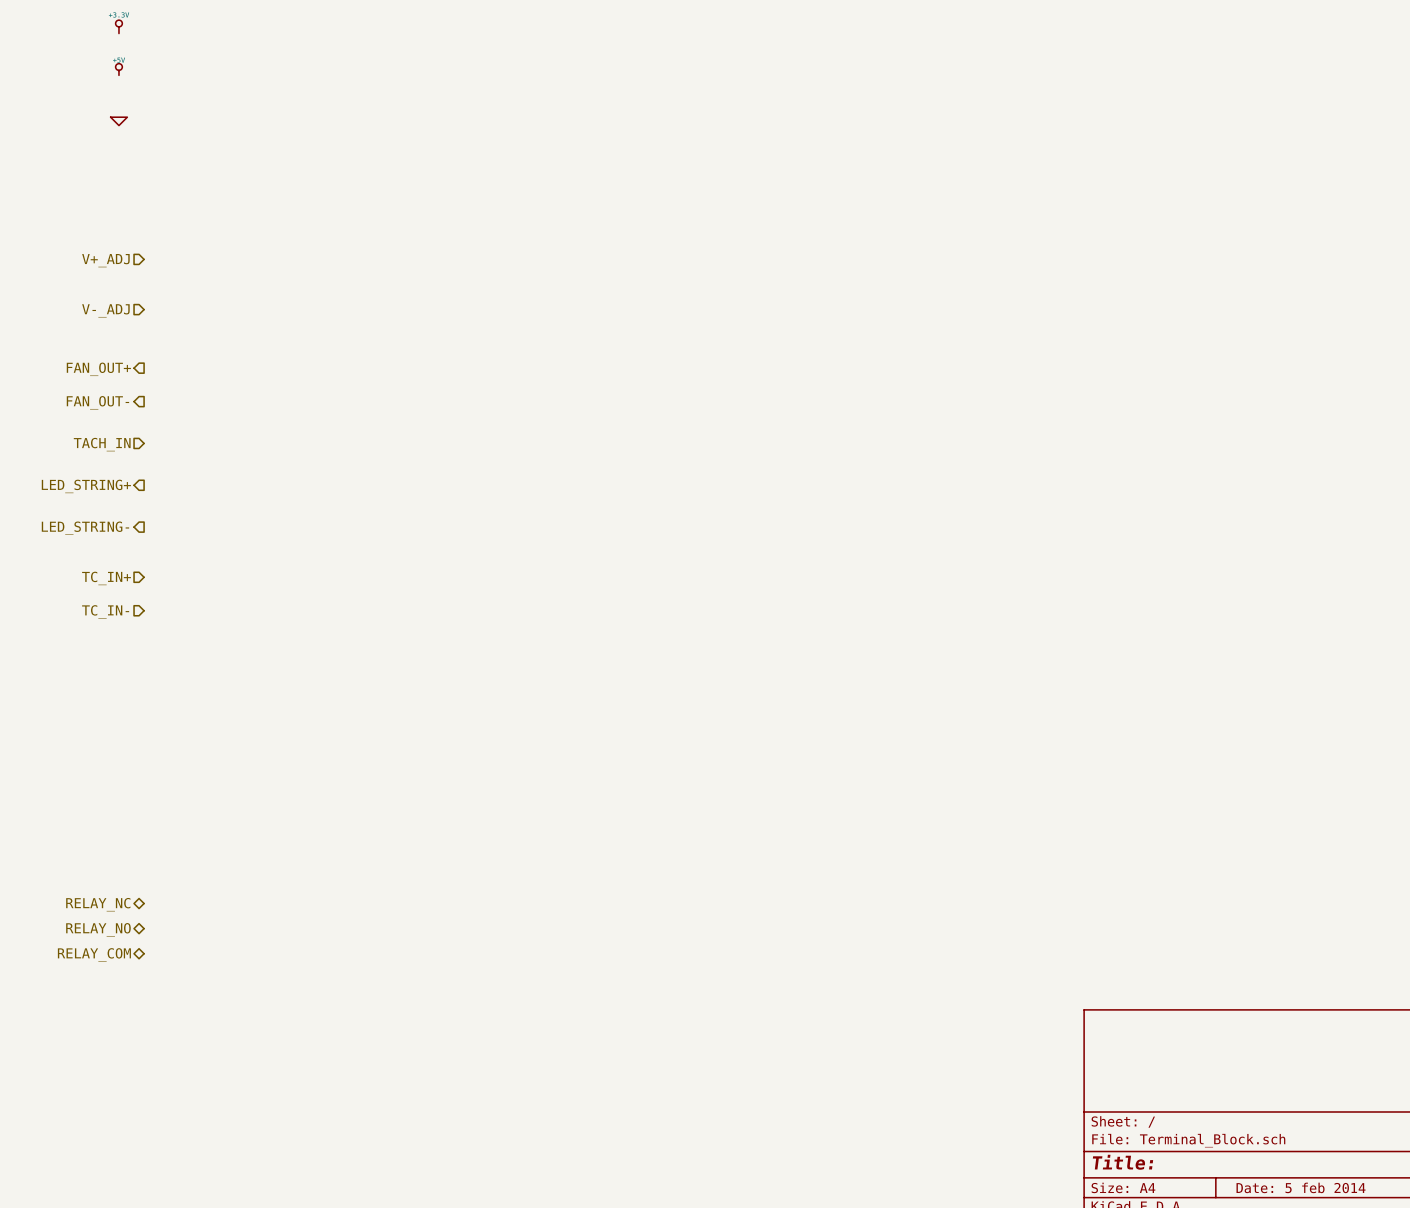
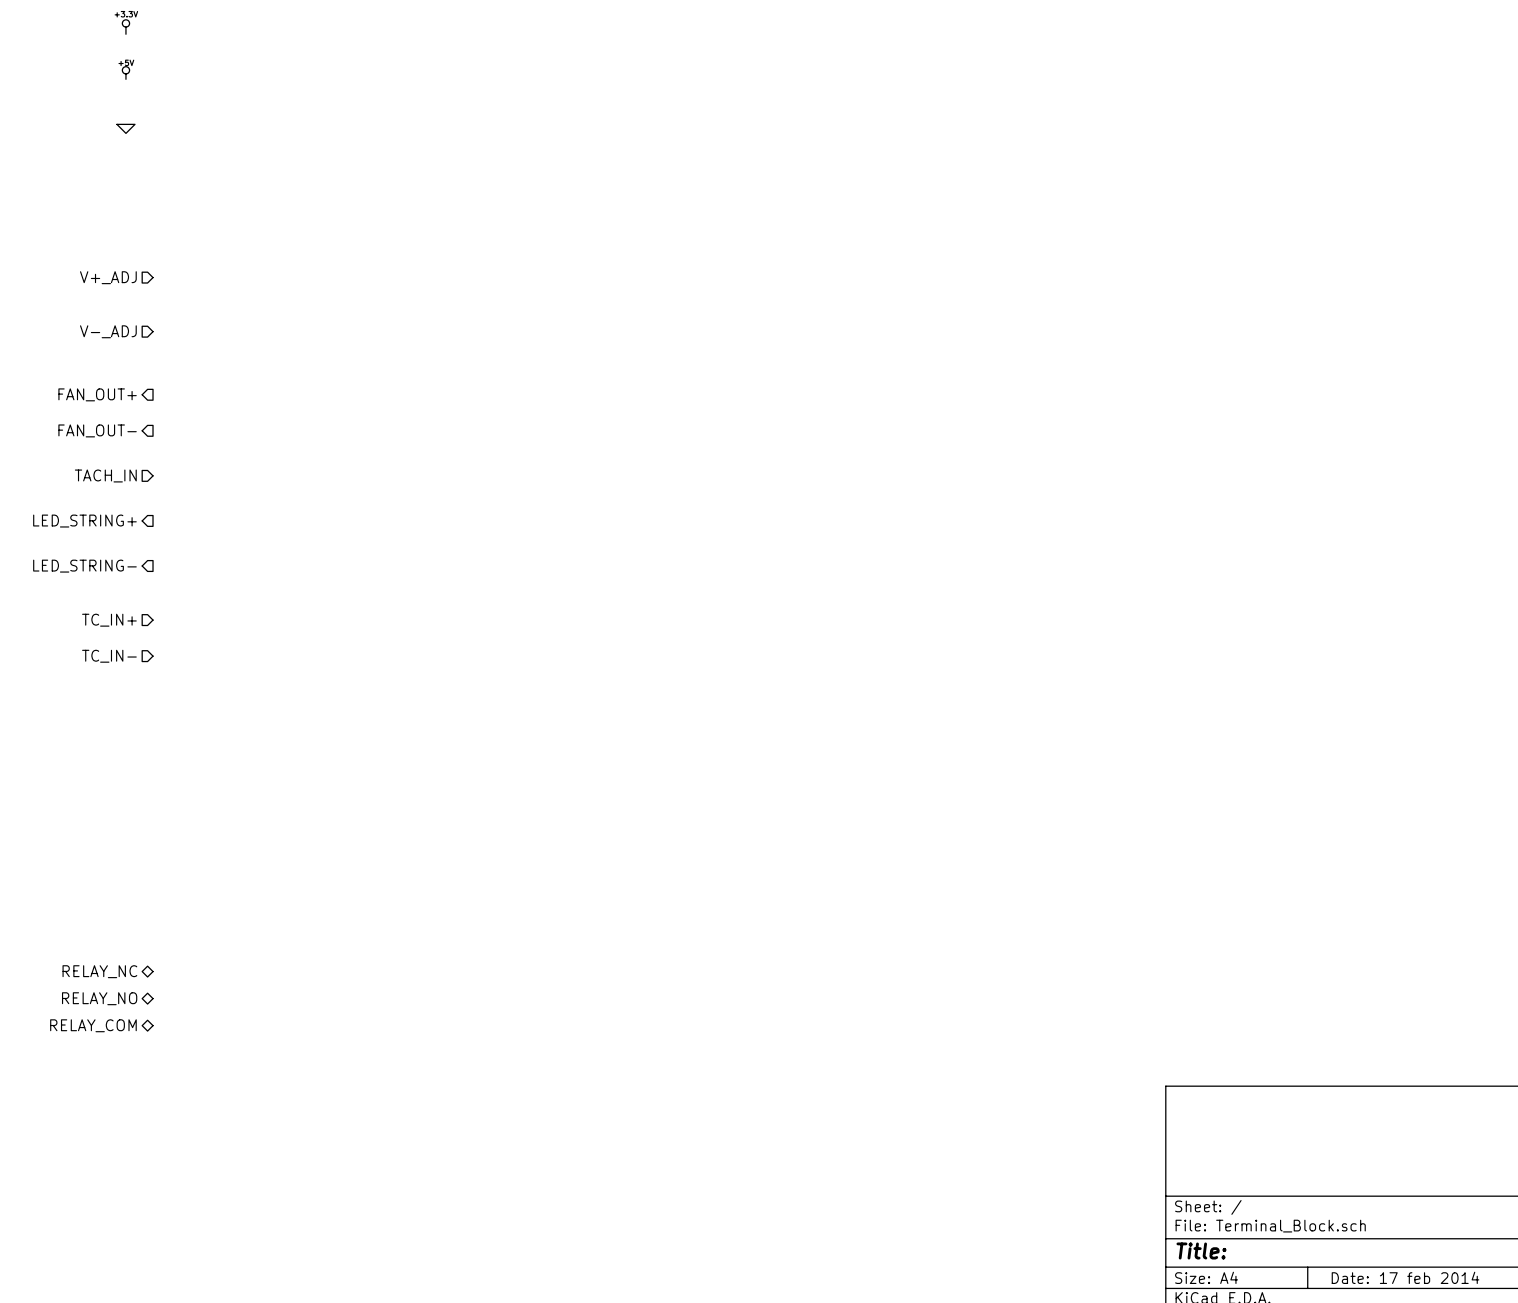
title block: Date: 5 feb 2014 (1301, 1187) -> Date: 17 feb 2014 (1405, 1277)

